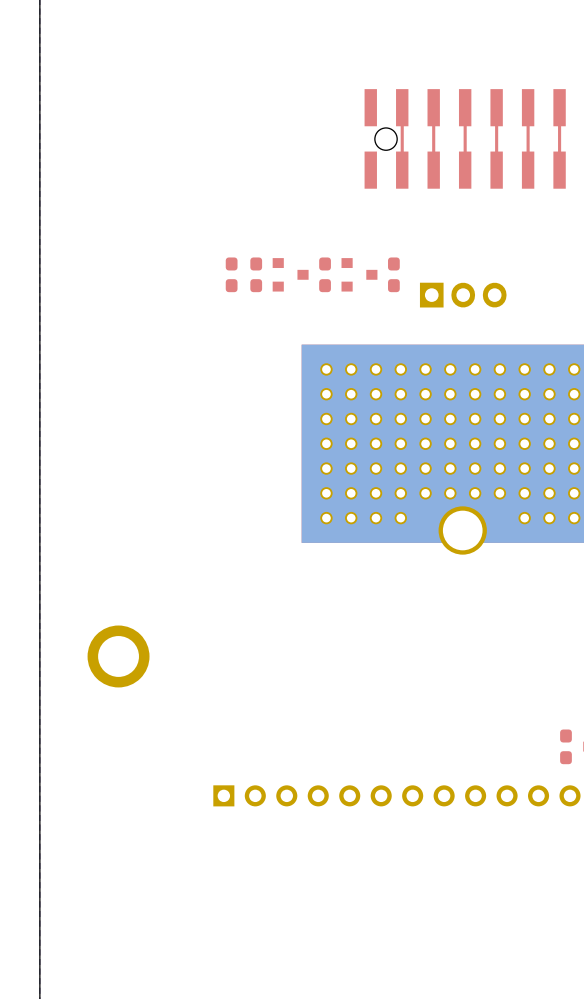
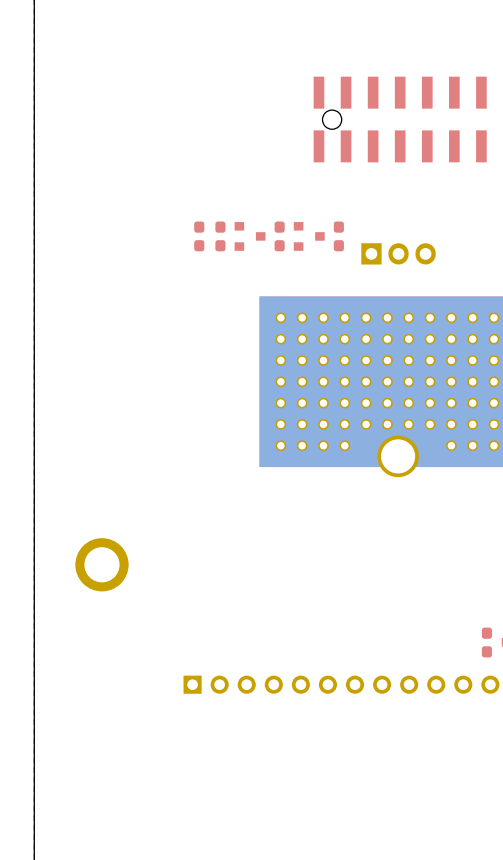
top track: (402, 107) (402, 170) -> none
top track: (433, 107) (433, 170) -> none
top track: (465, 107) (465, 170) -> none
top track: (496, 107) (496, 170) -> none
top track: (528, 107) (528, 170) -> none
top track: (559, 107) (559, 170) -> none

